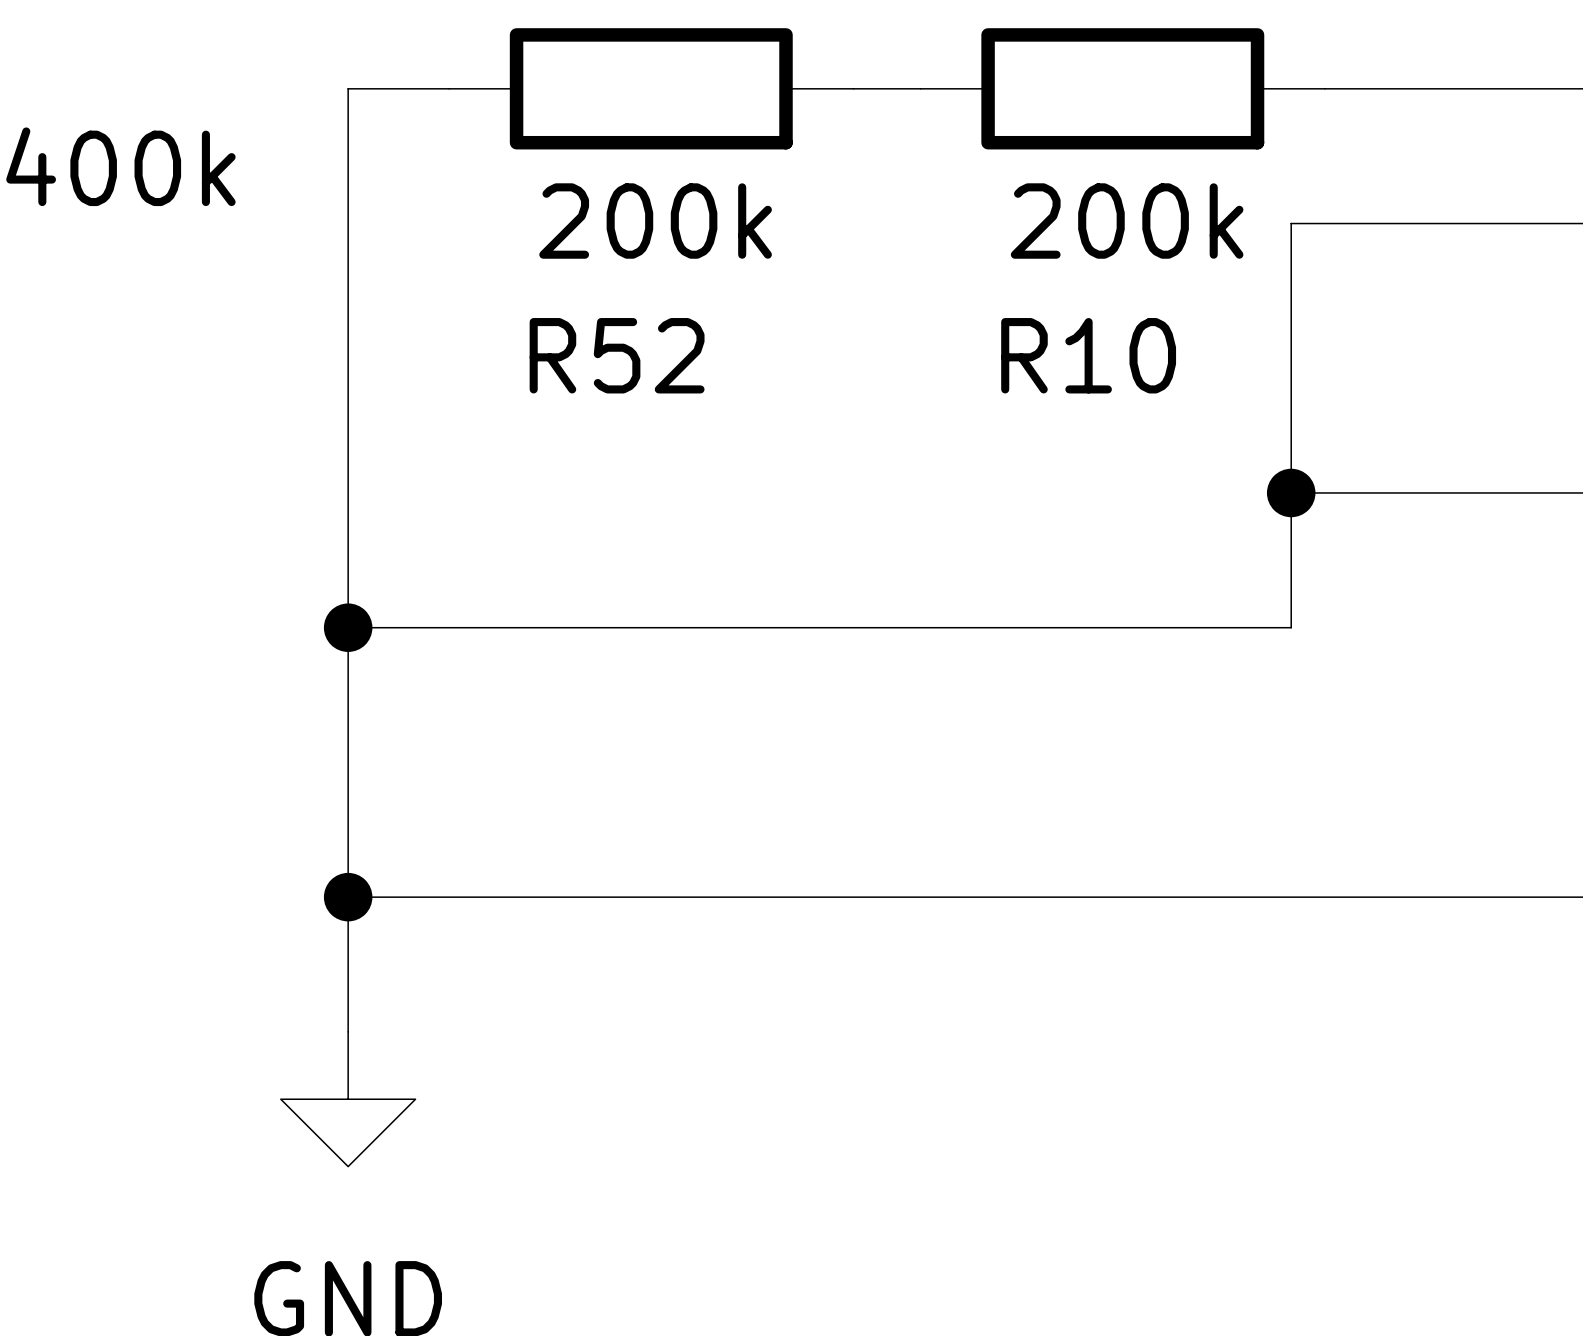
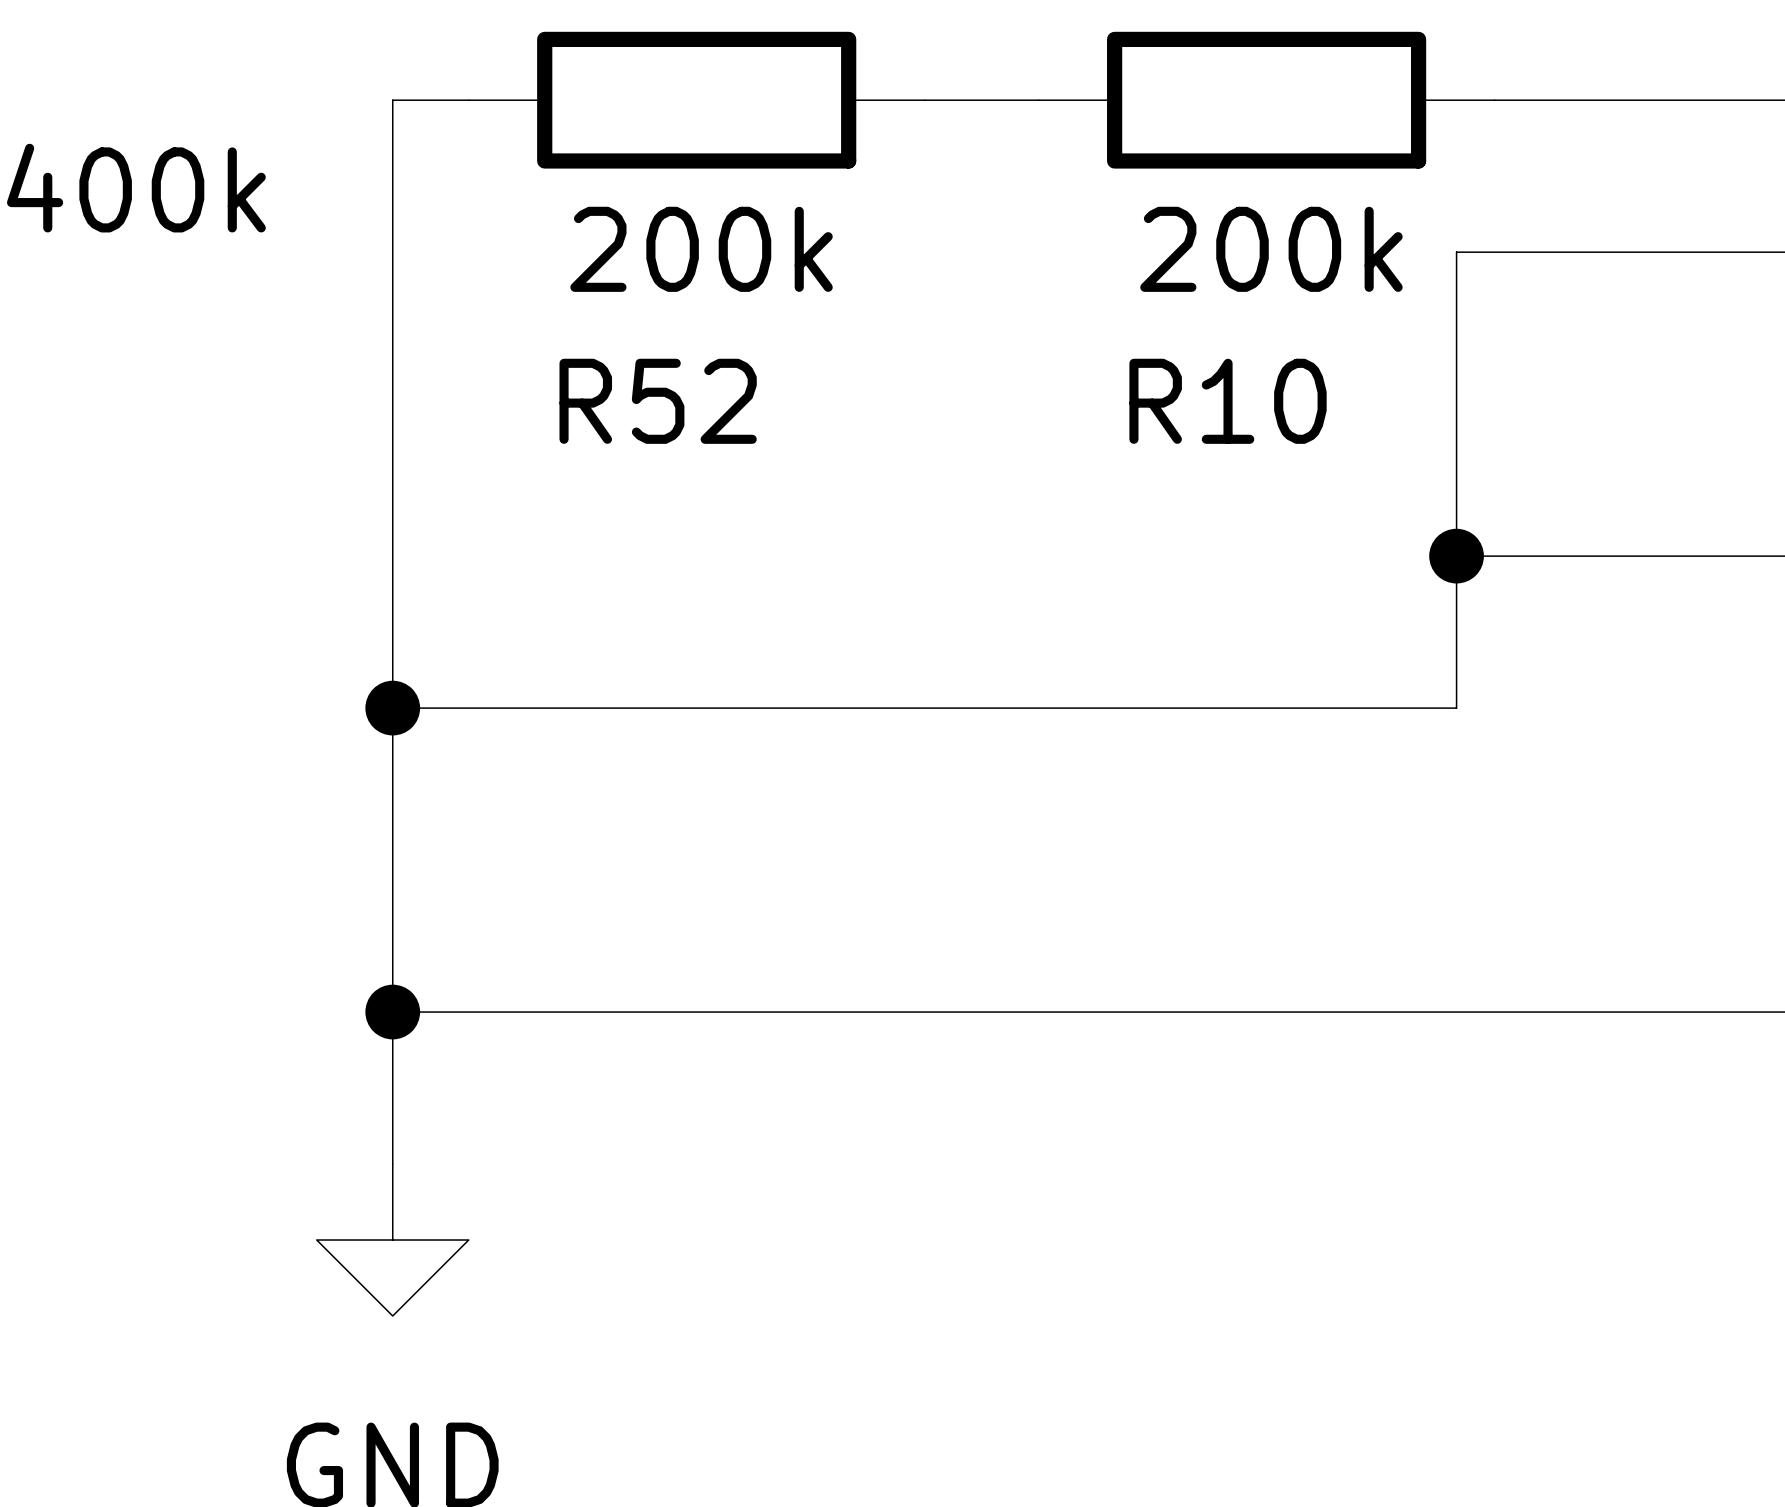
R52 position: (651, 88) -> (696, 100)

